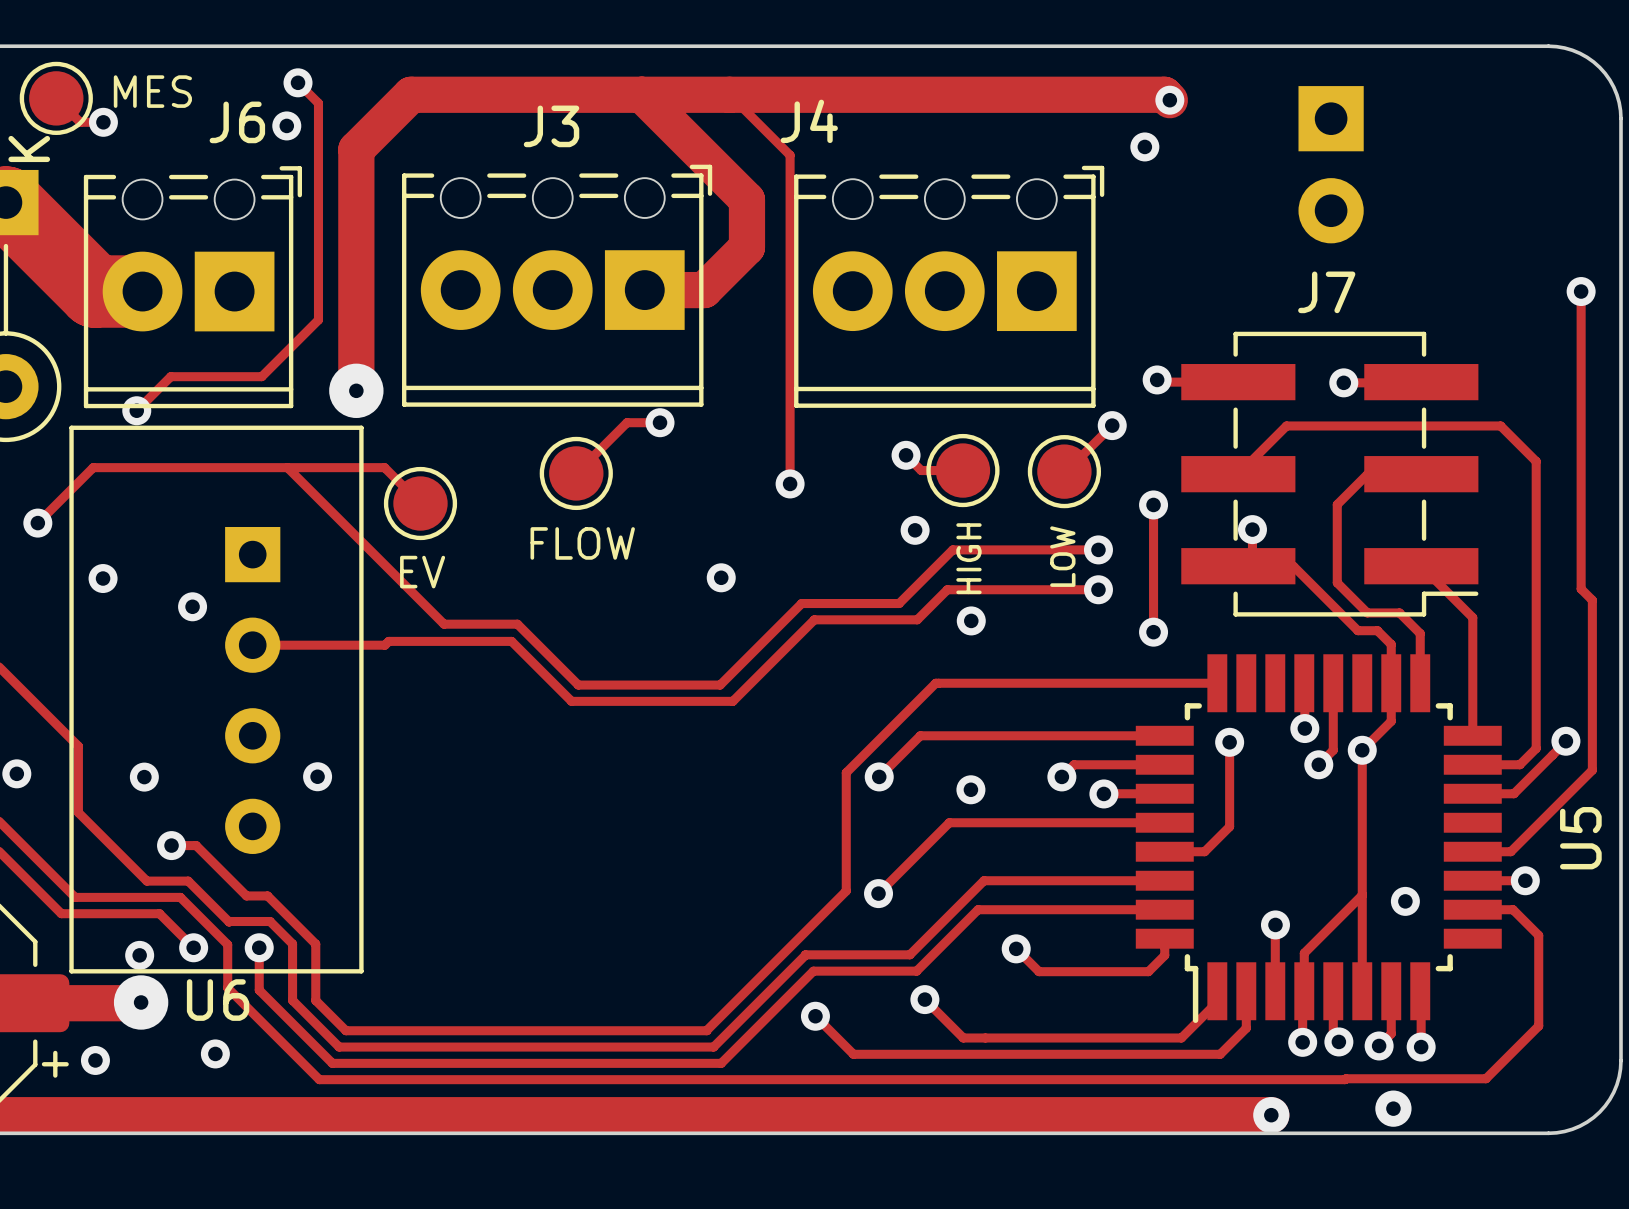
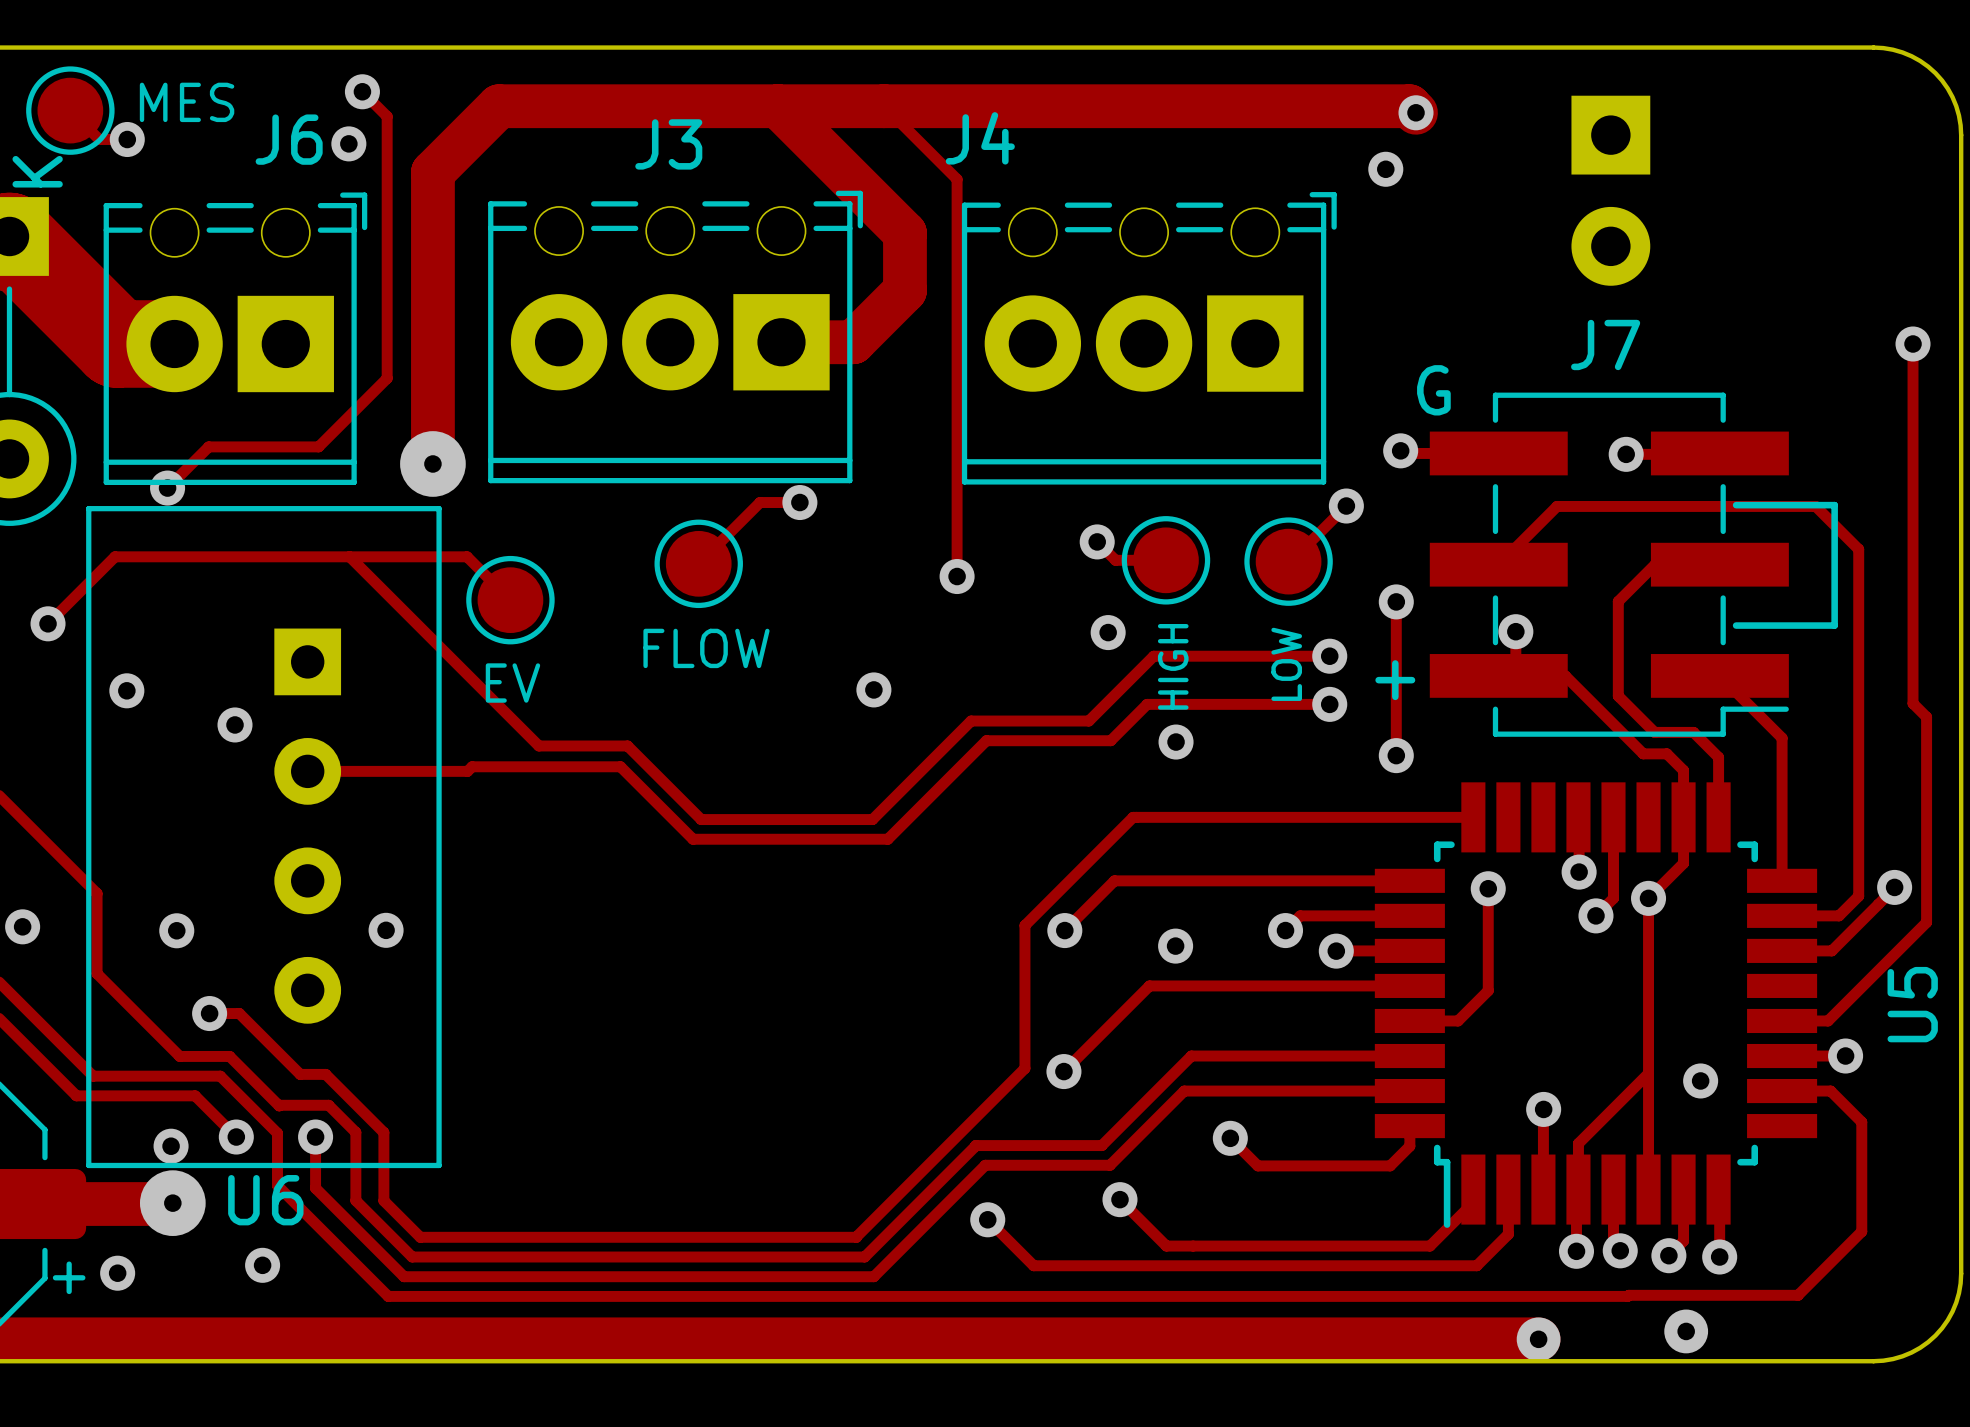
text: none -> G (1433, 390)
line: none -> (1736, 505) (1834, 505) (1834, 625) (1736, 625)
text: none -> + (1395, 680)

